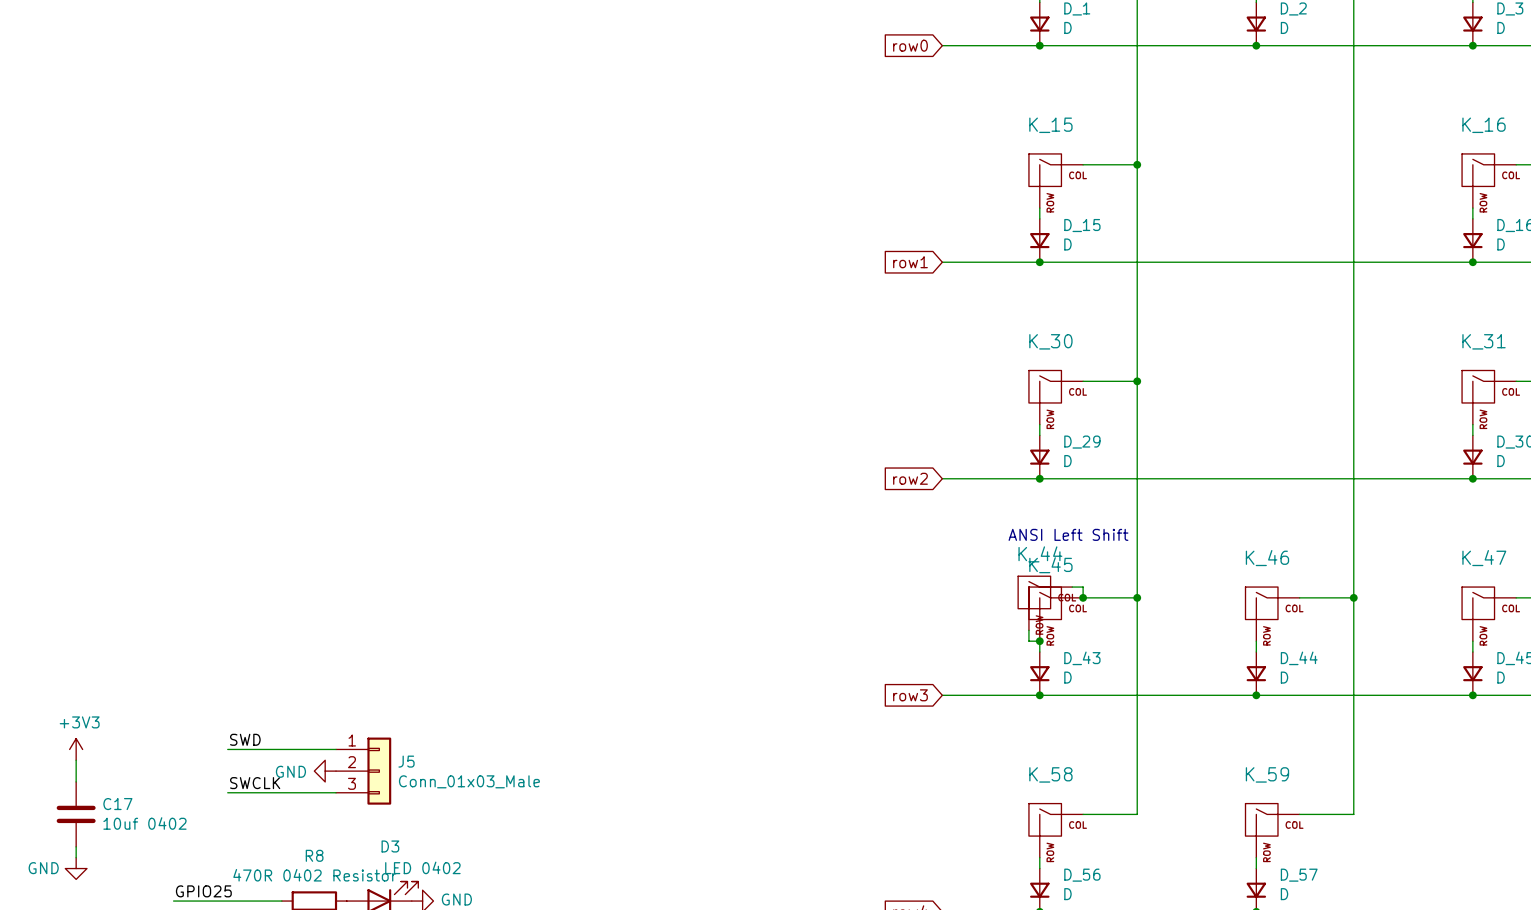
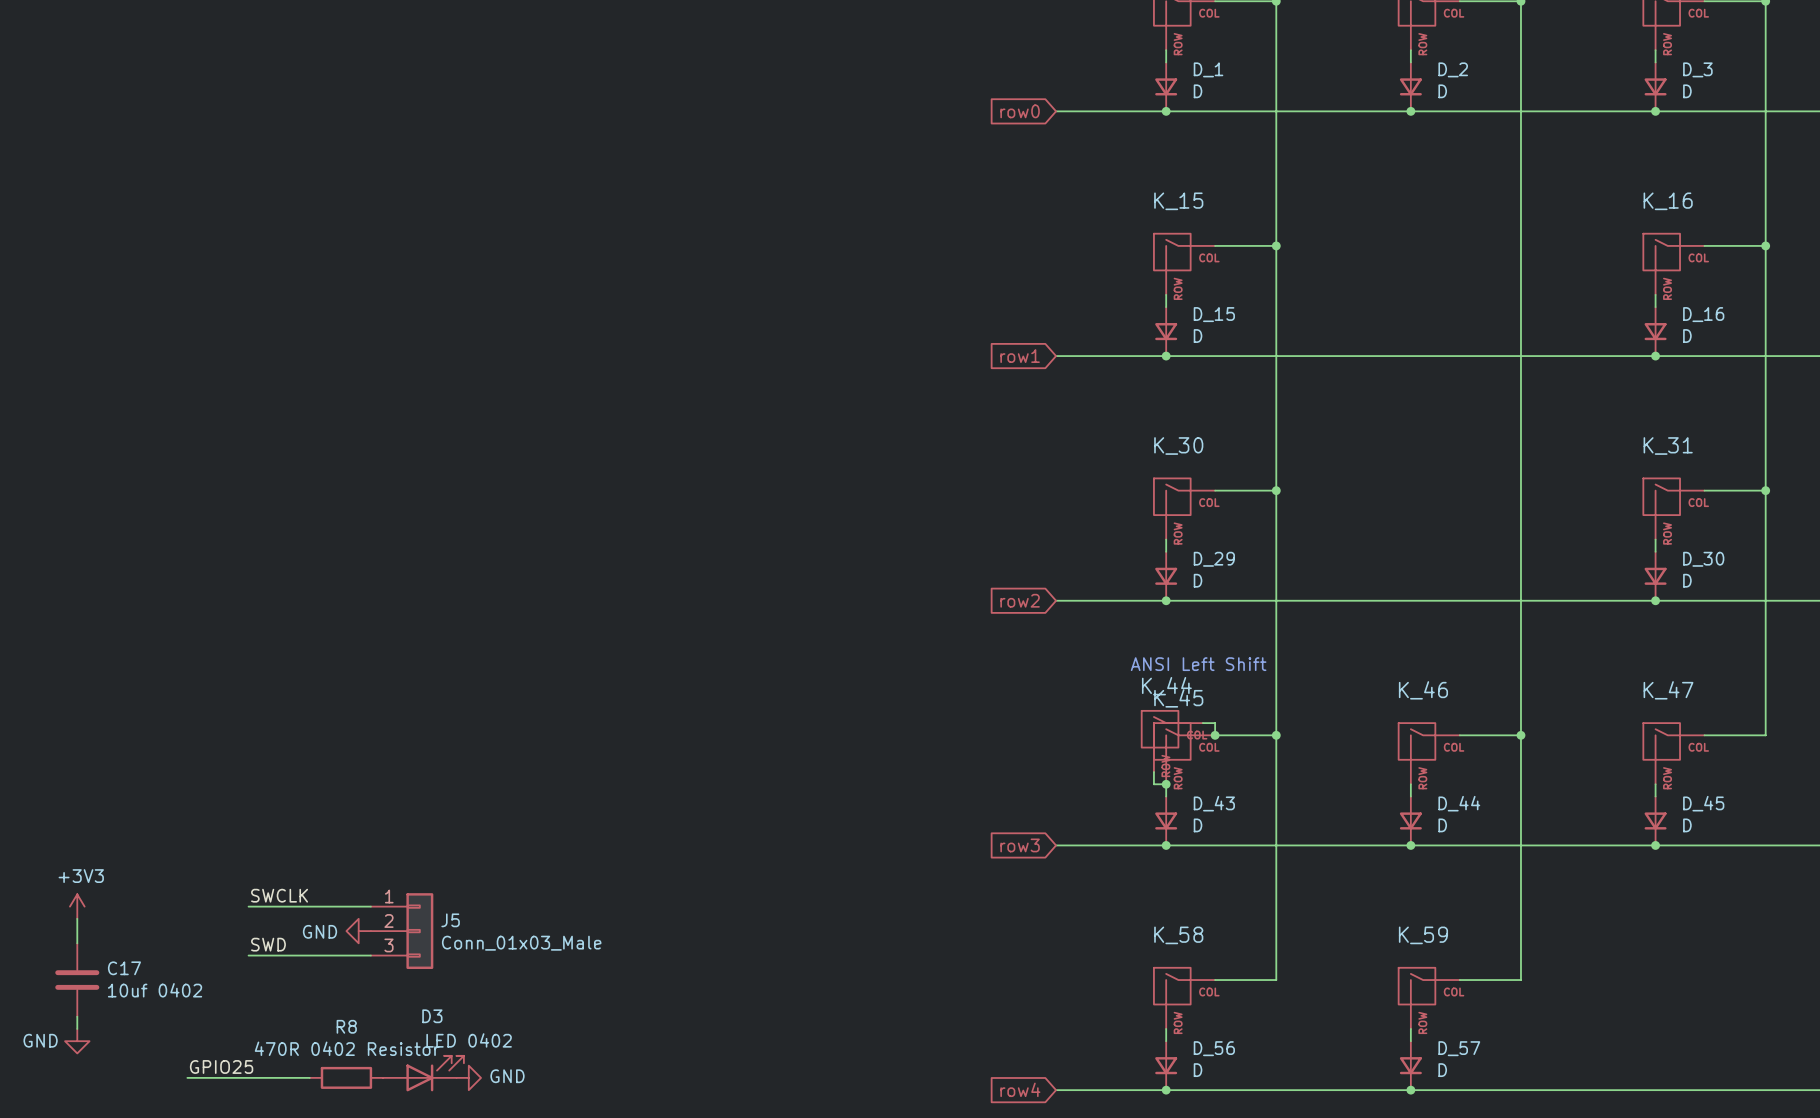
label: SWD (245, 739) -> SWCLK (279, 895)
label: SWCLK (255, 783) -> SWD (268, 944)

